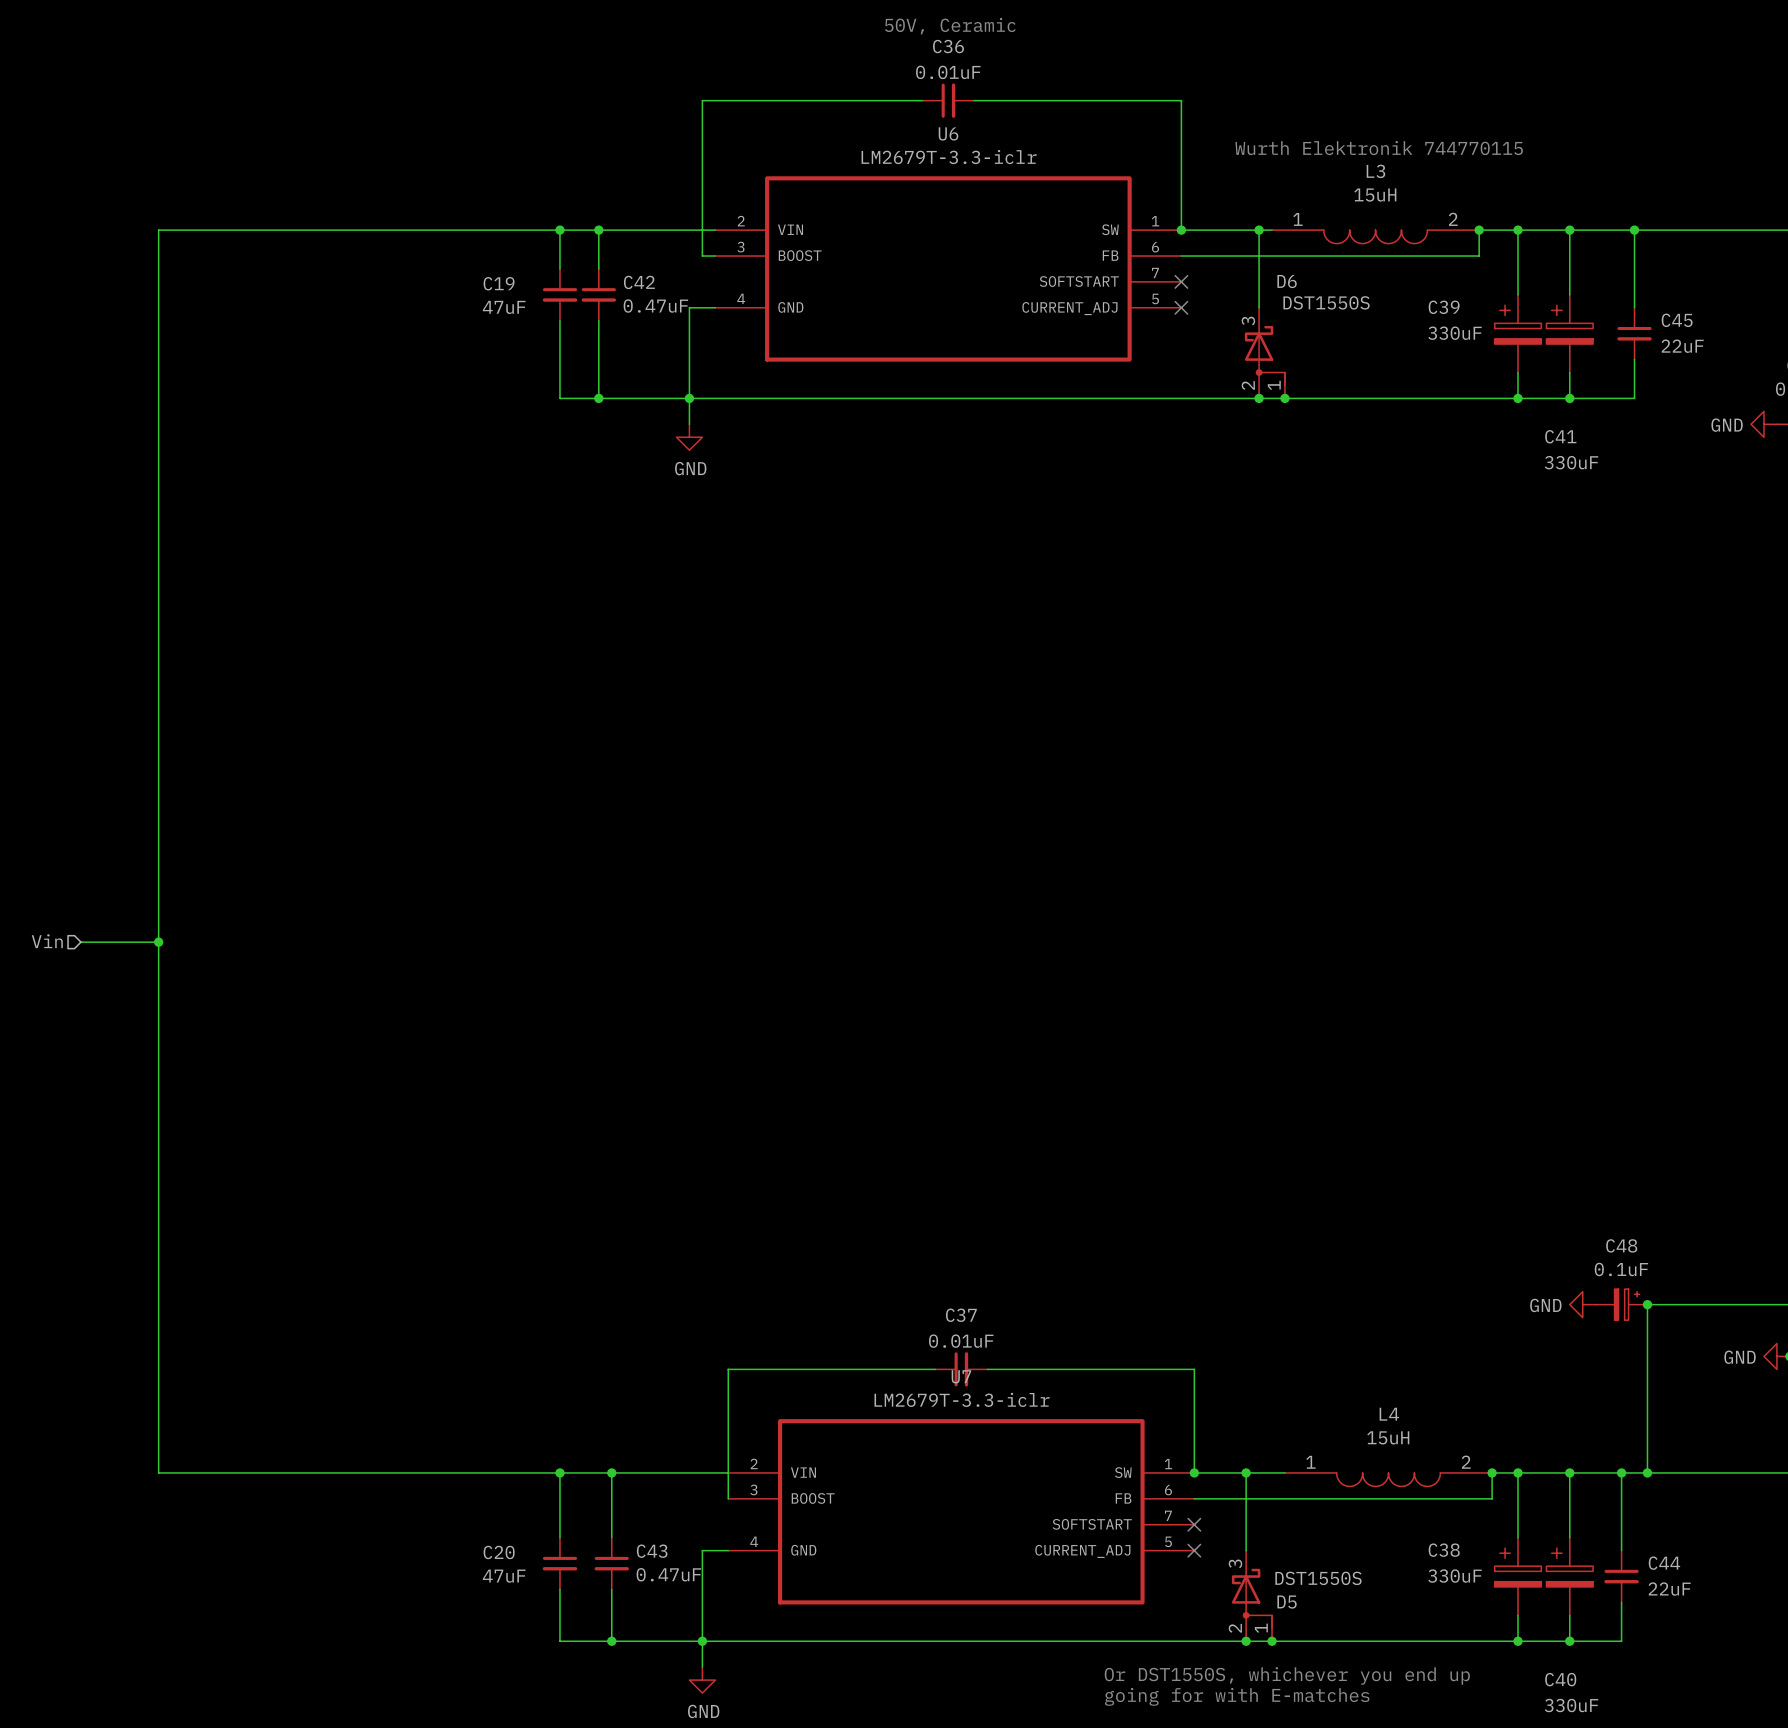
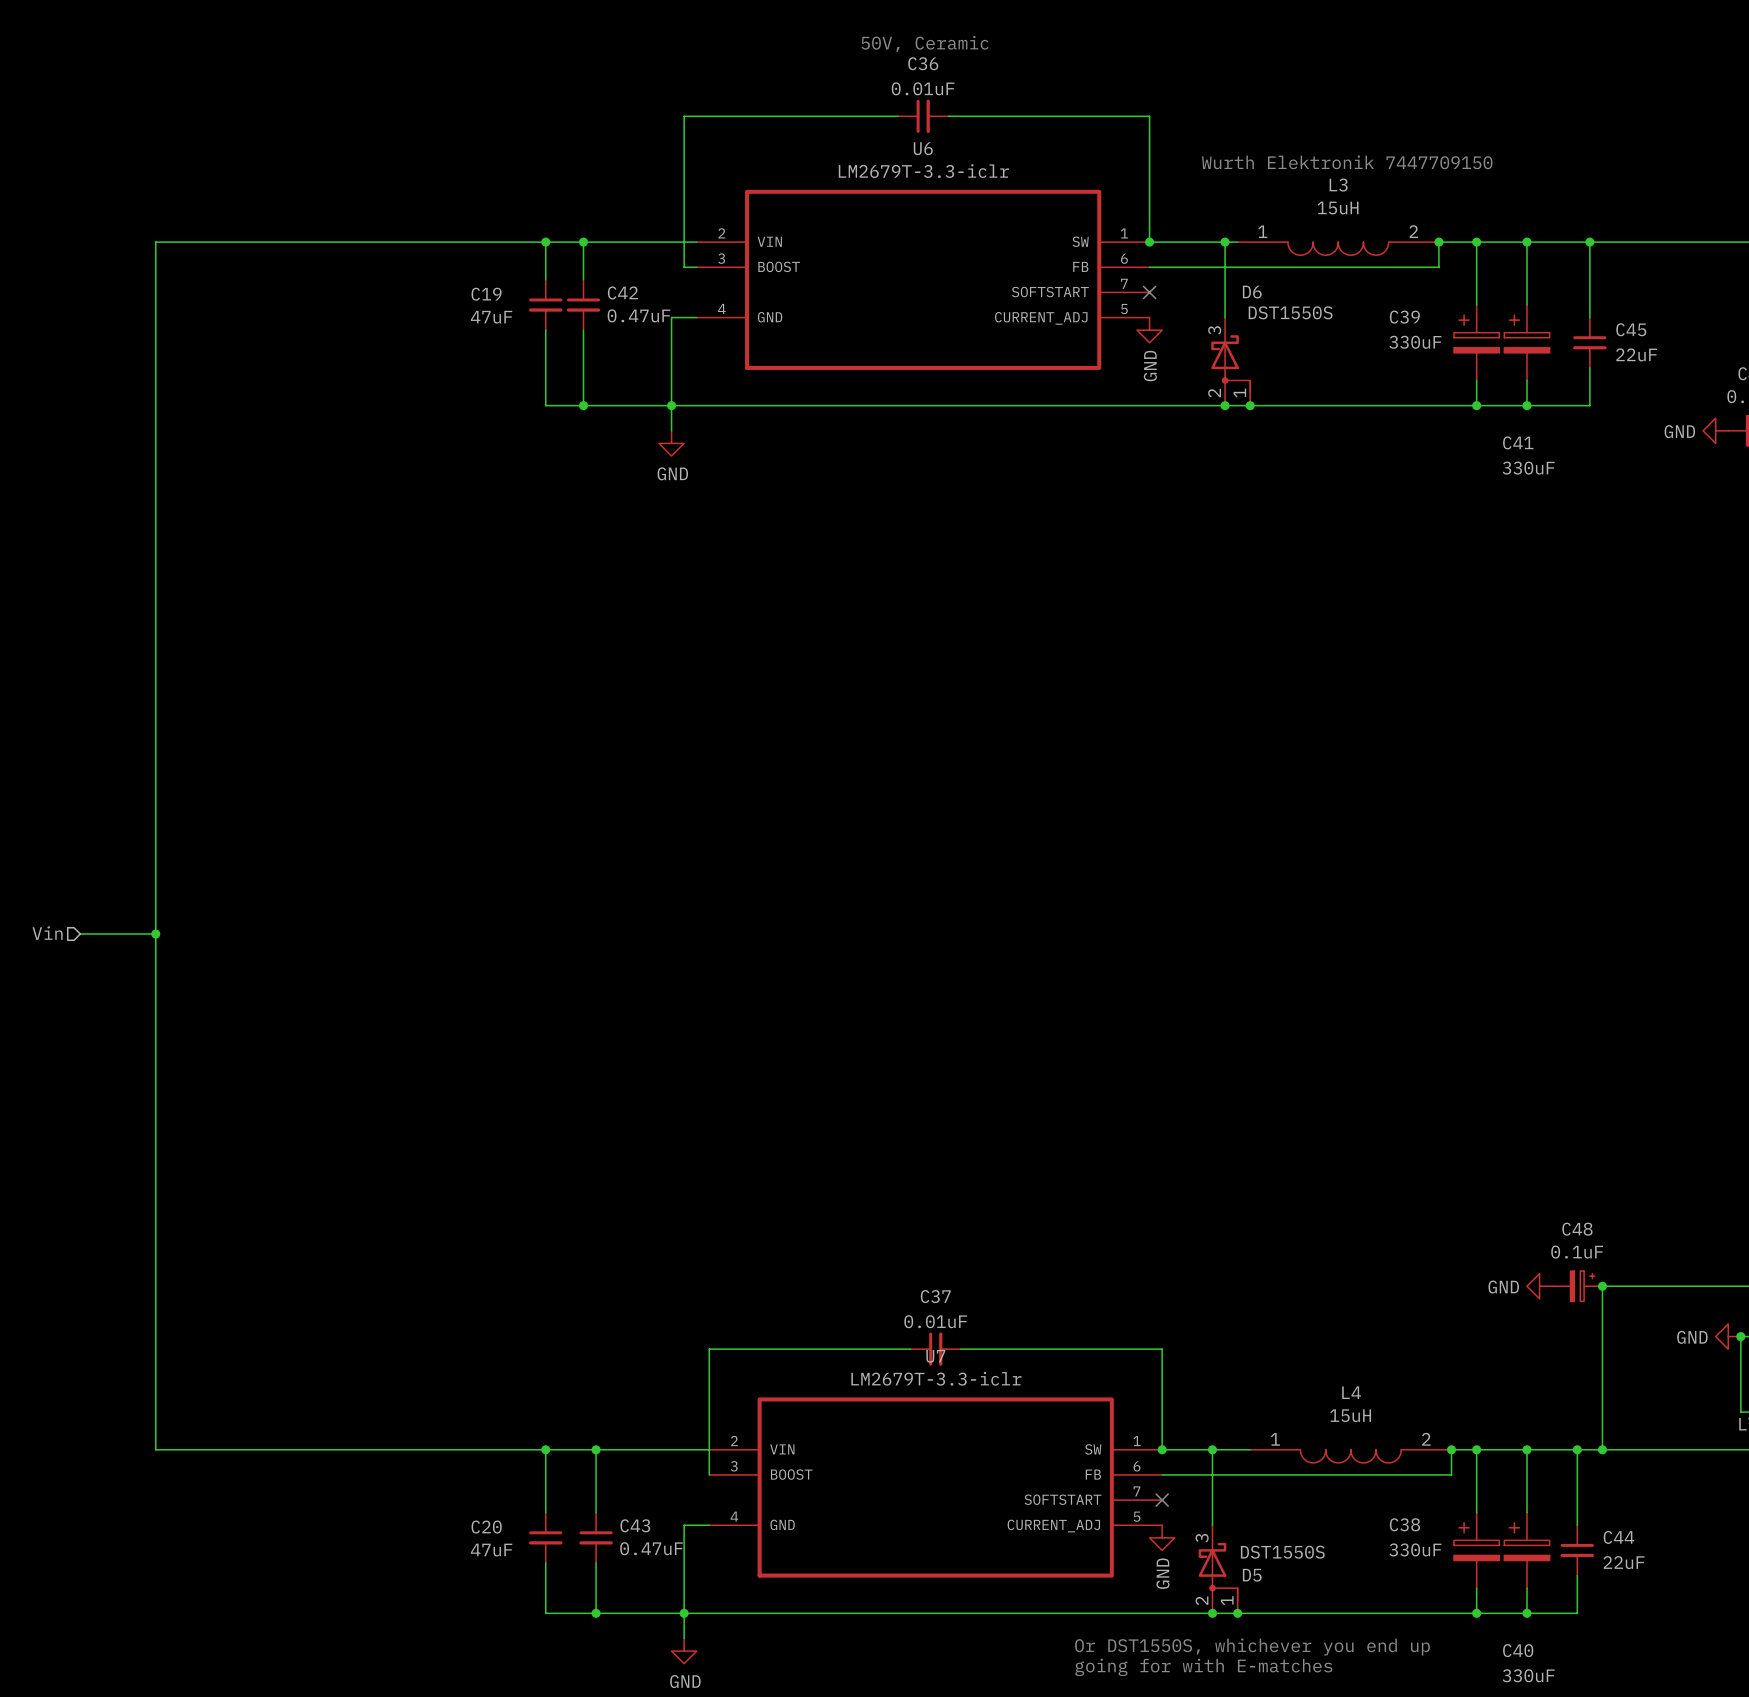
text: Wurth Elektronik 744770115 (1379, 148) -> Wurth Elektronik 7447709150 (1347, 162)
no-connect mark: (1181, 307) -> none
power symbol: none -> GND (1149, 330)
no-connect mark: (1194, 1550) -> none
power symbol: none -> GND (1162, 1537)

